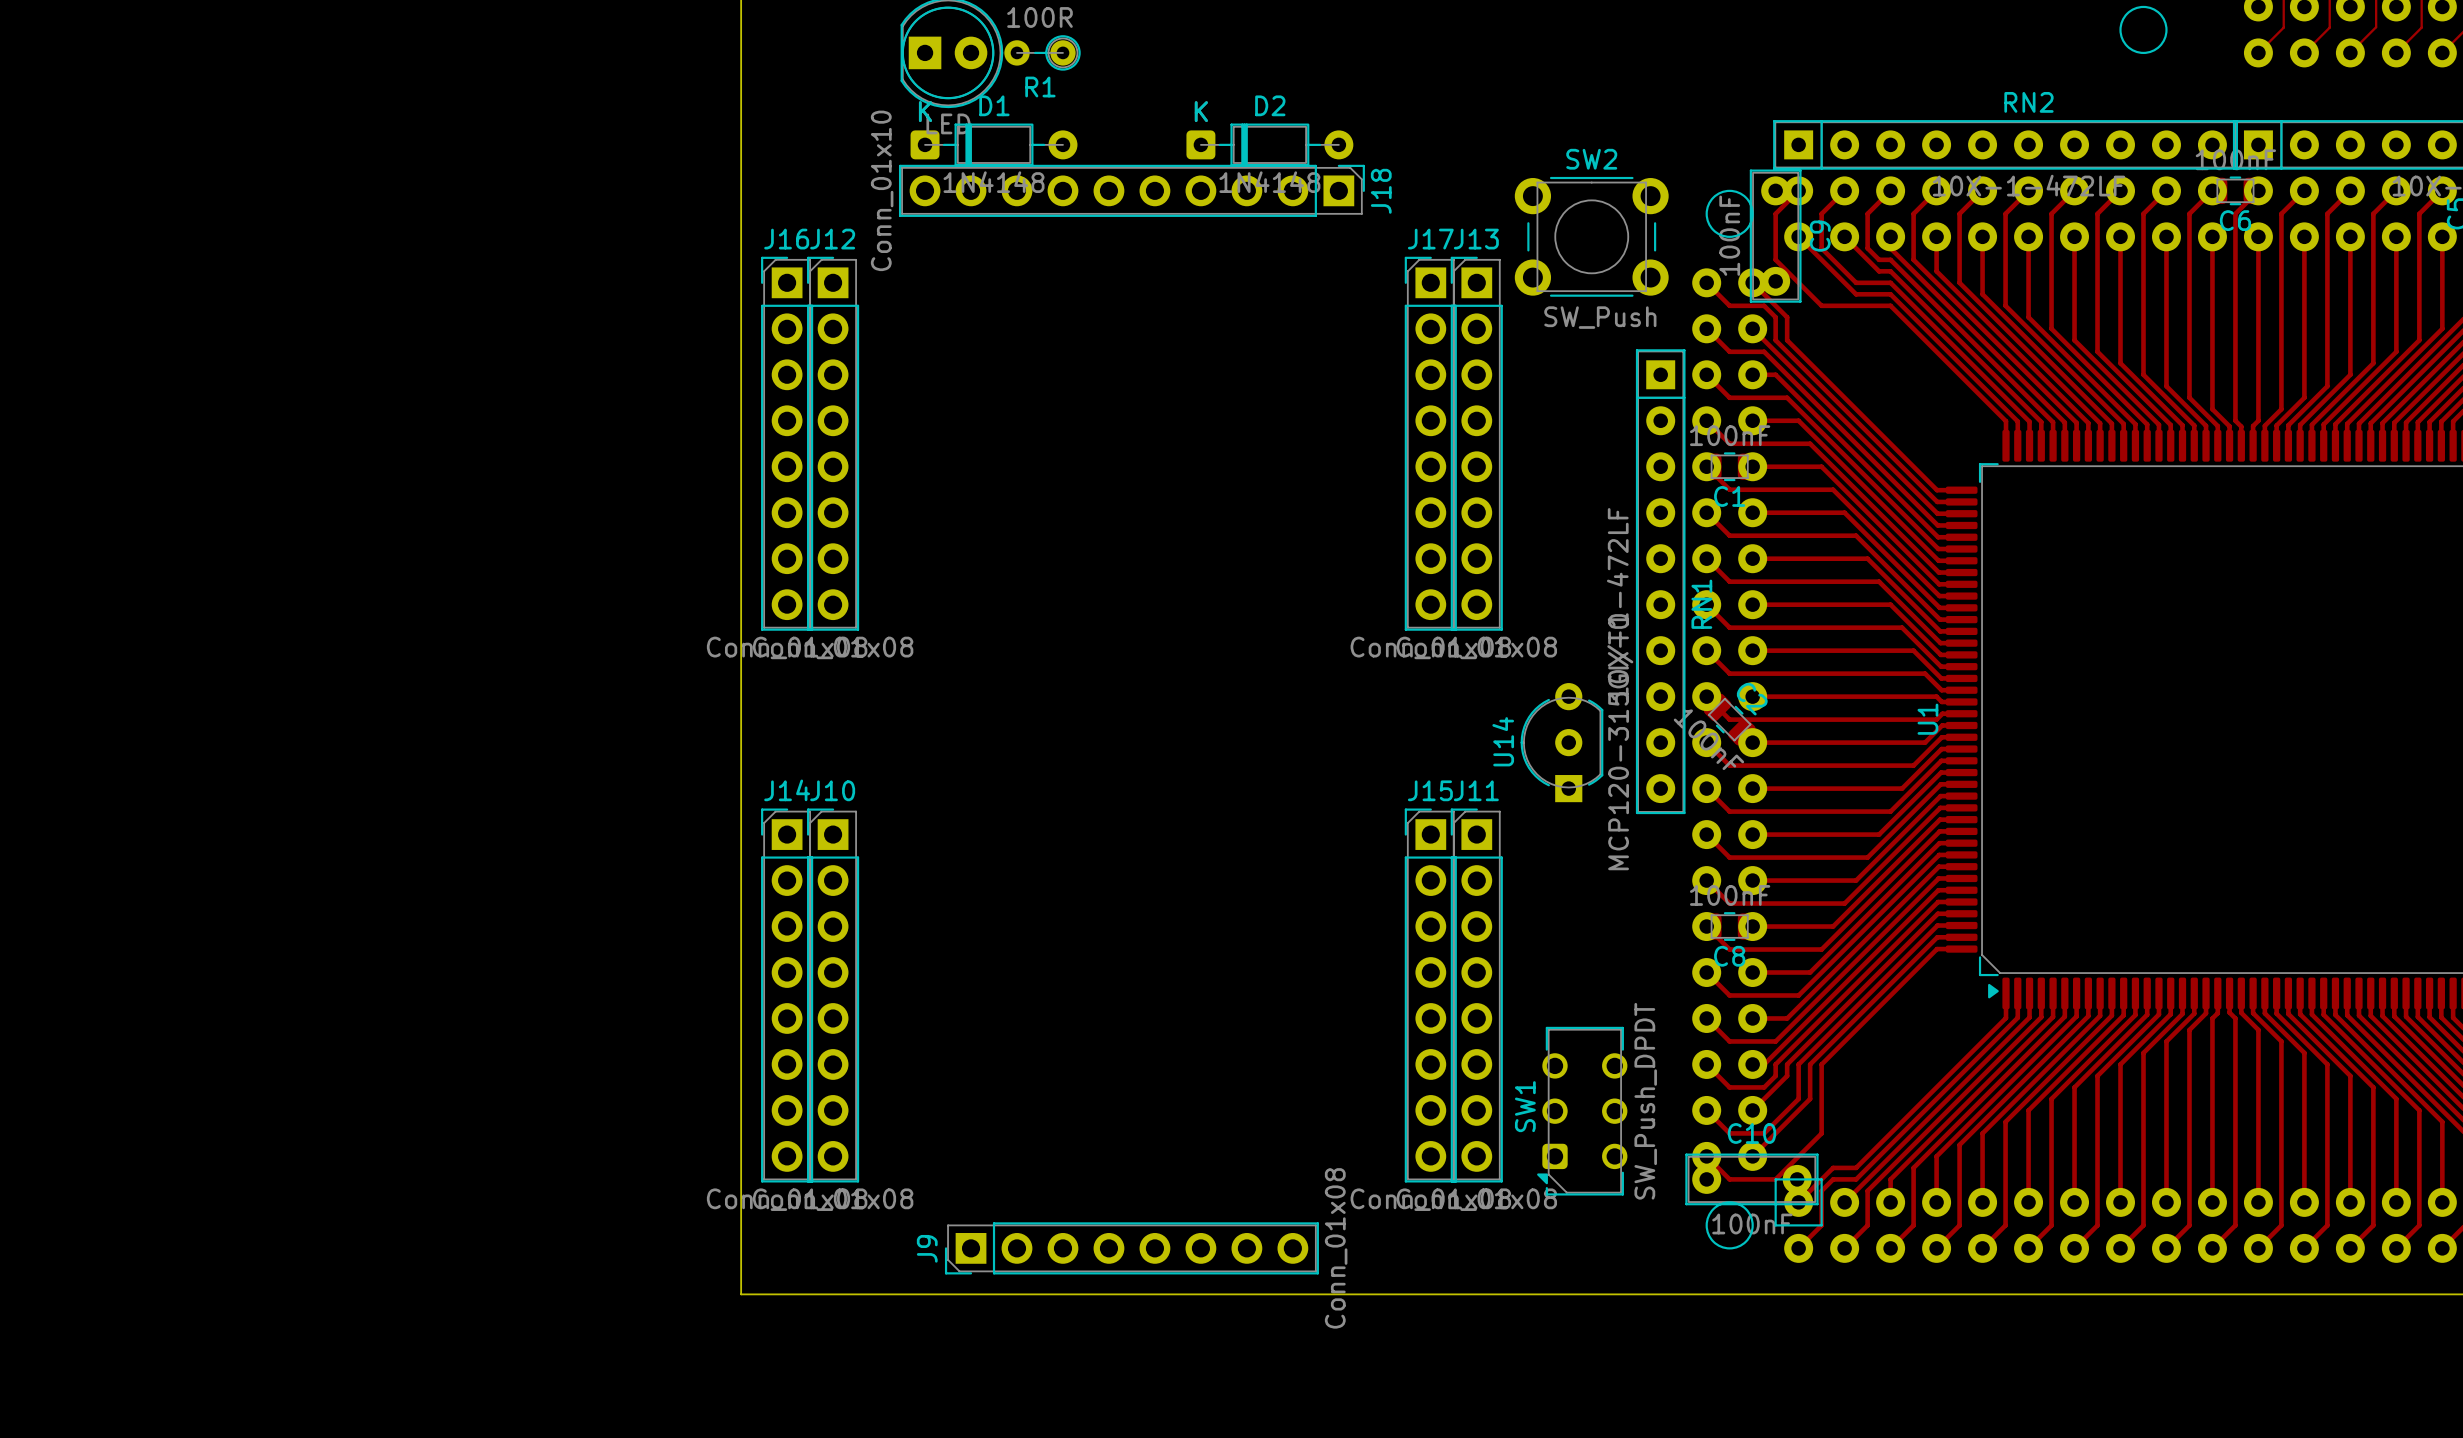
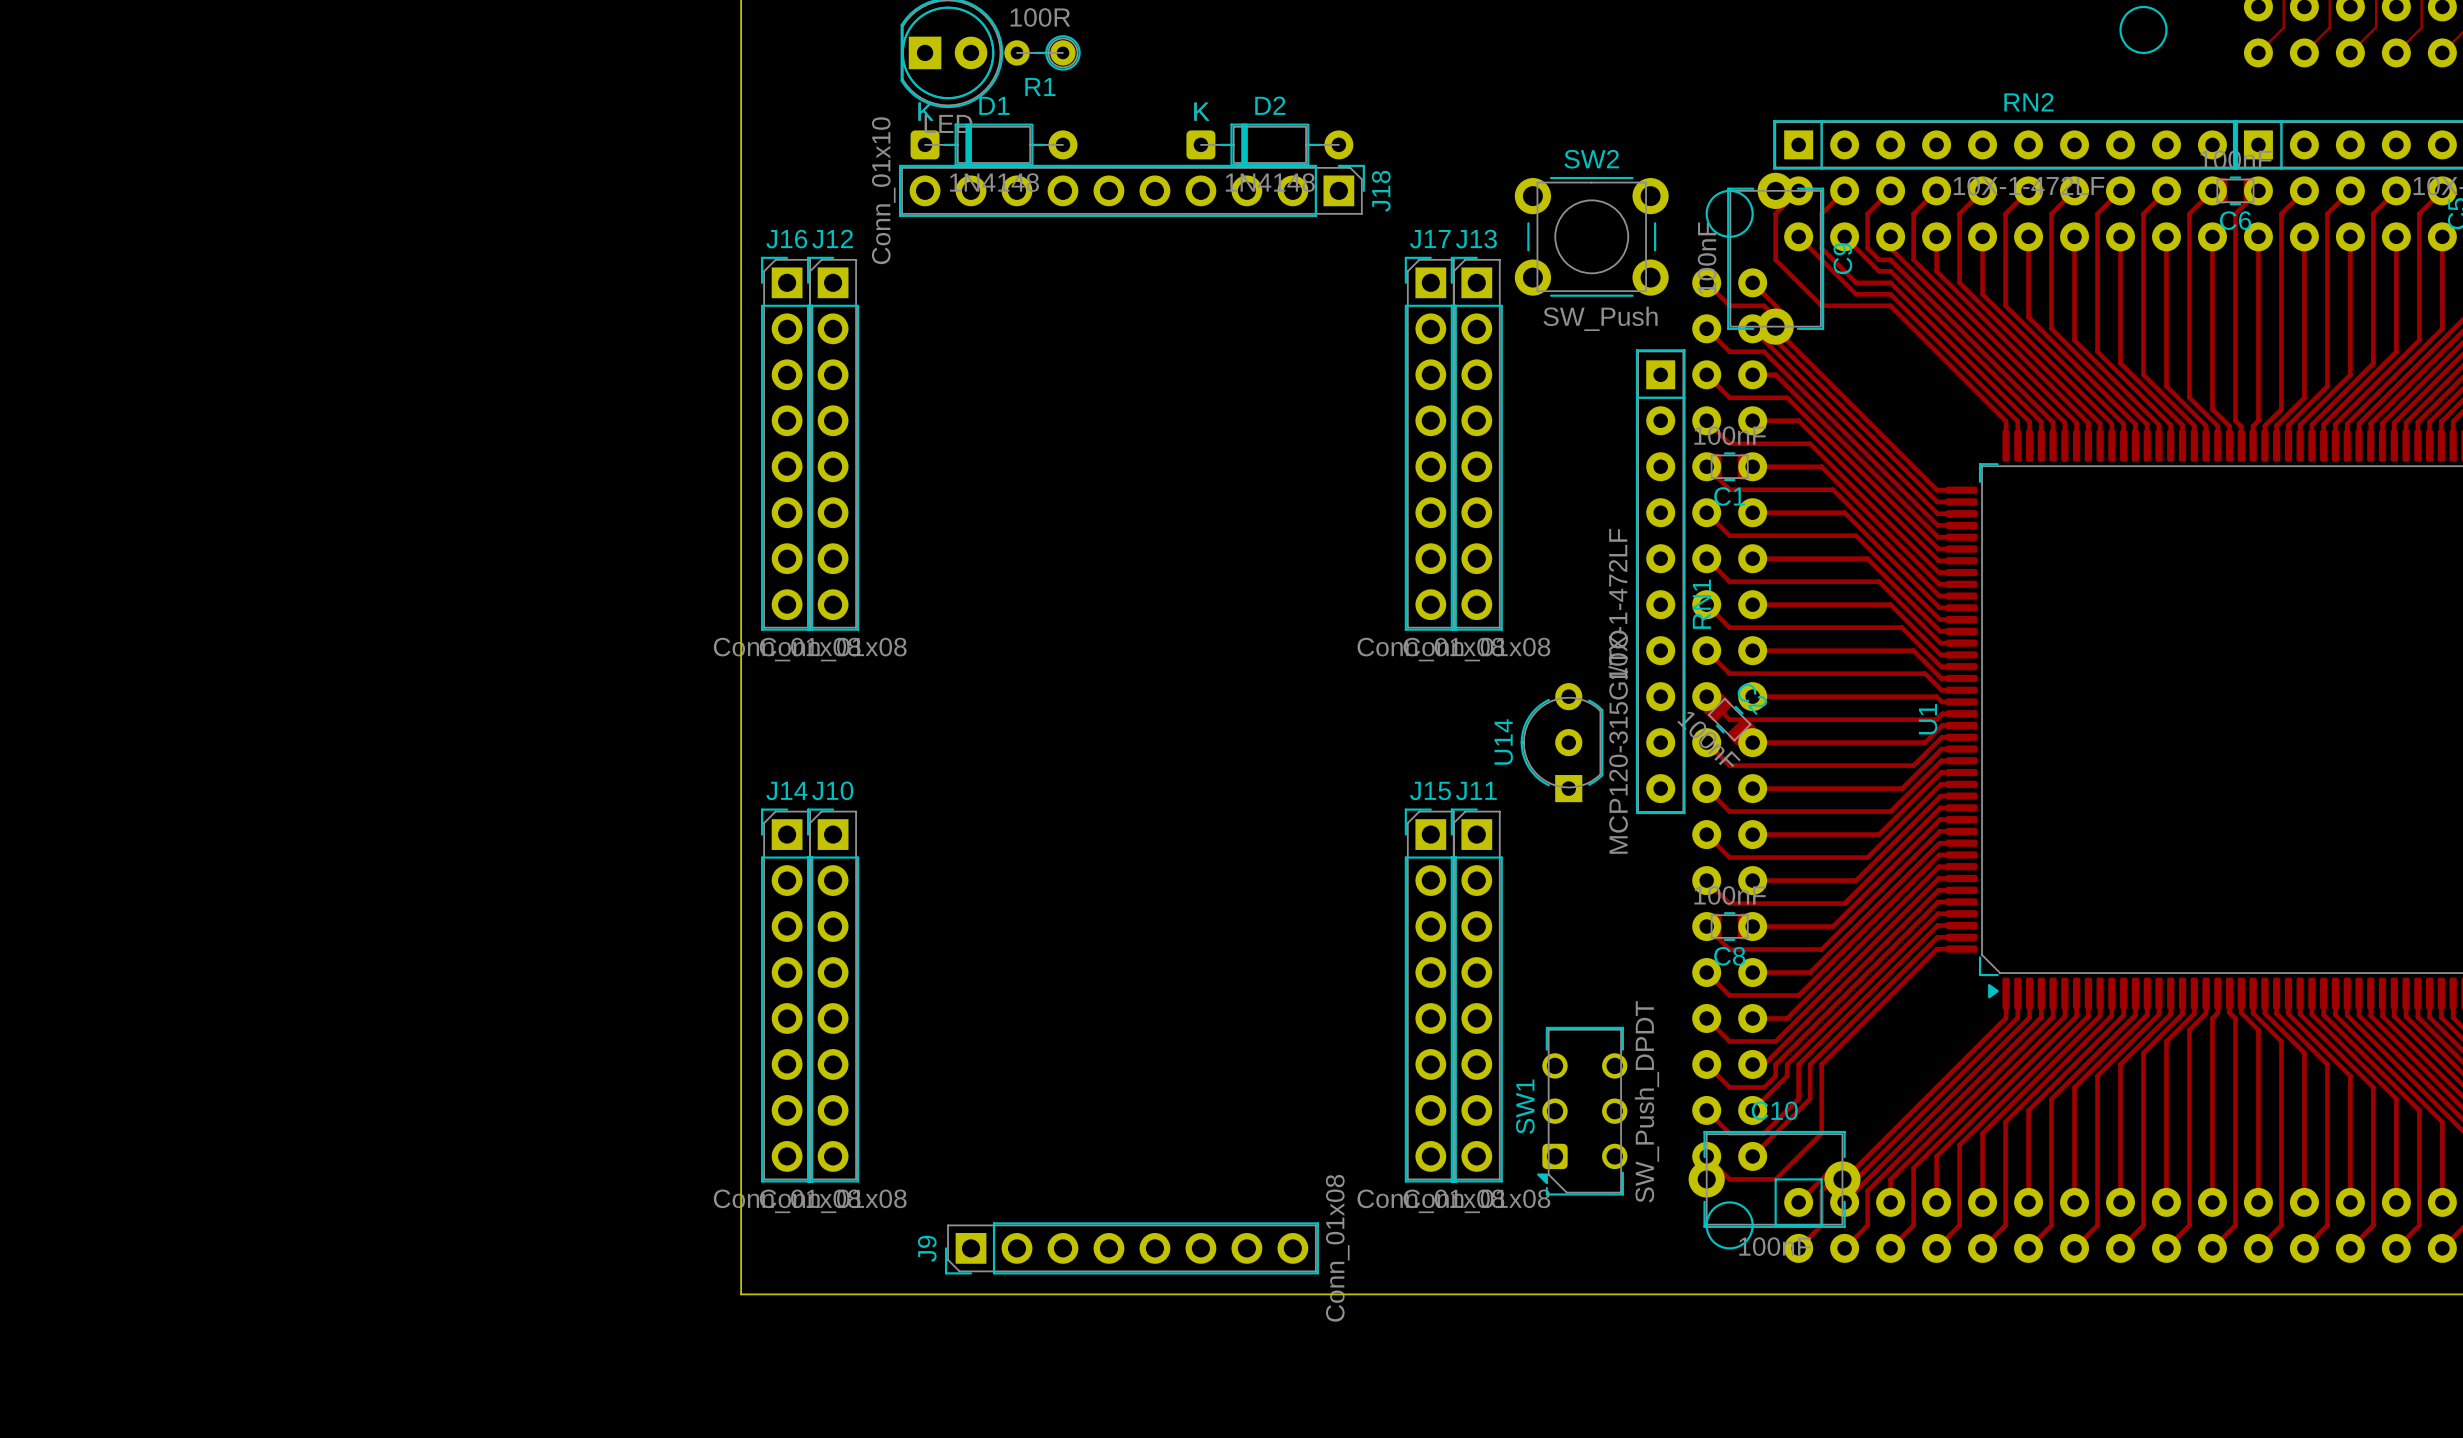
C9 footprint: [1749, 169, 1802, 303] -> [1727, 172, 1825, 345]
C10 footprint: [1685, 1153, 1819, 1206] -> [1688, 1130, 1861, 1228]

